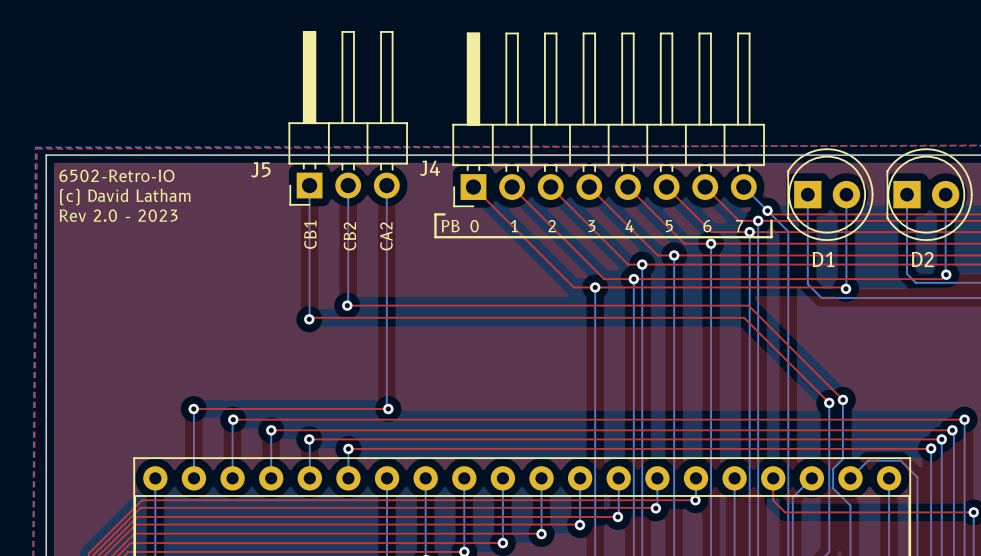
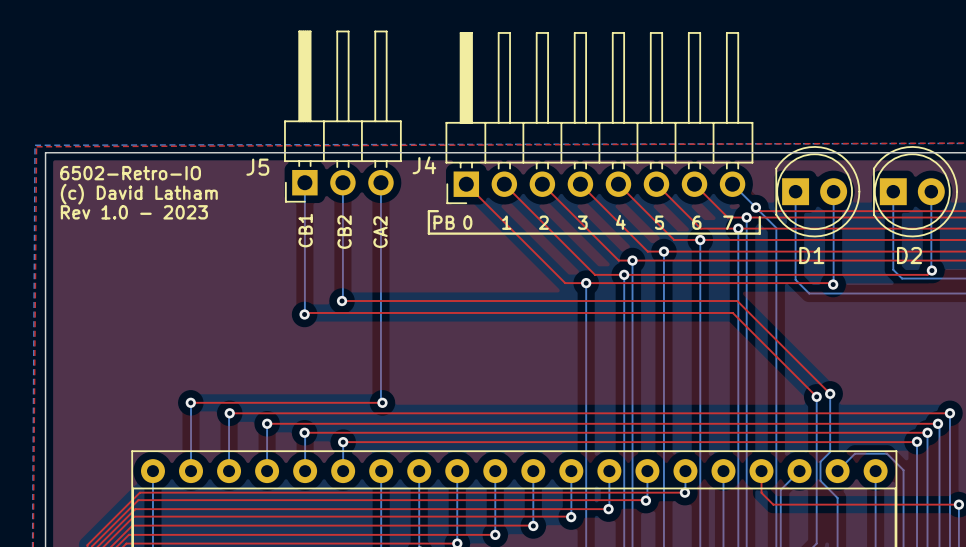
text: Rev 2.0 - 2023 (118, 215) -> Rev 1.0 - 2023 (134, 212)

